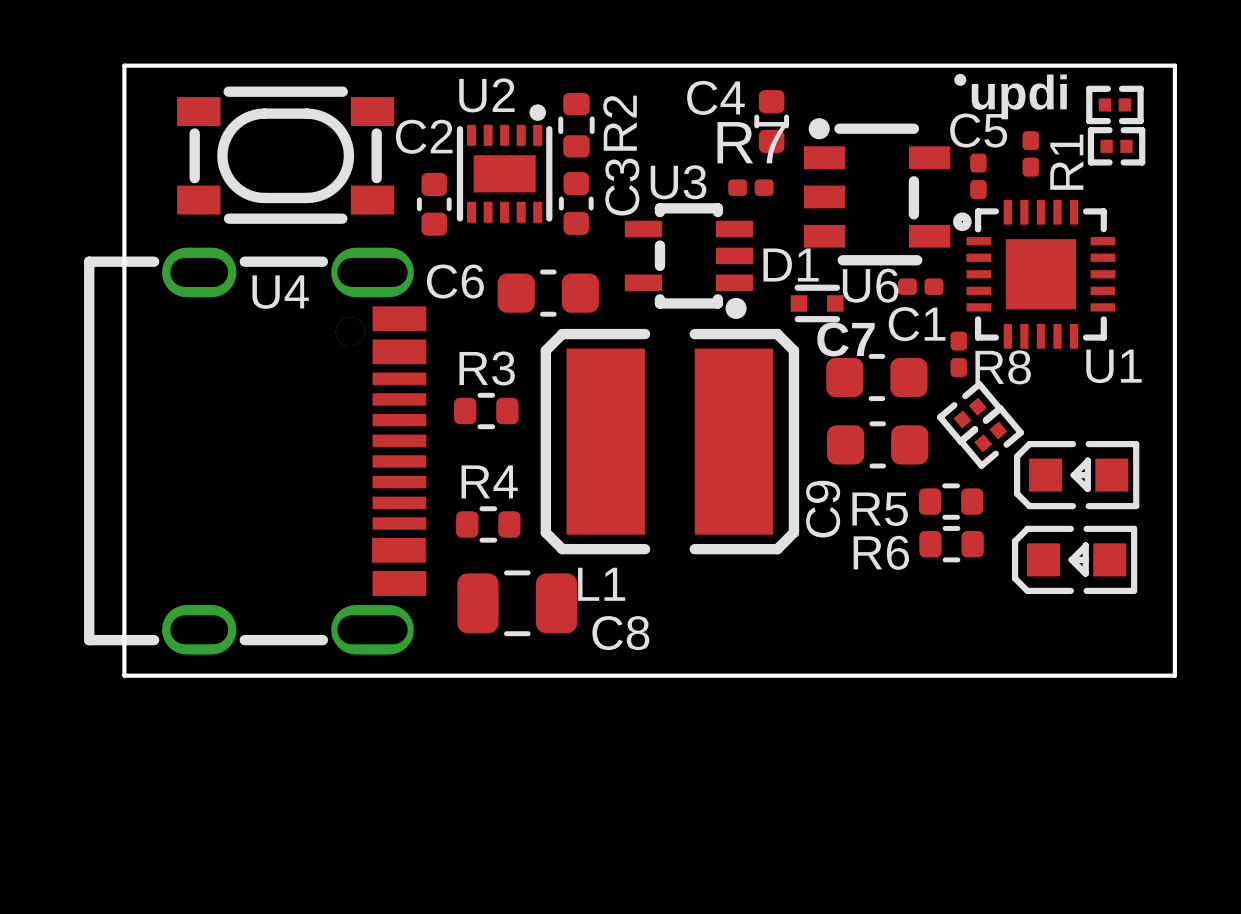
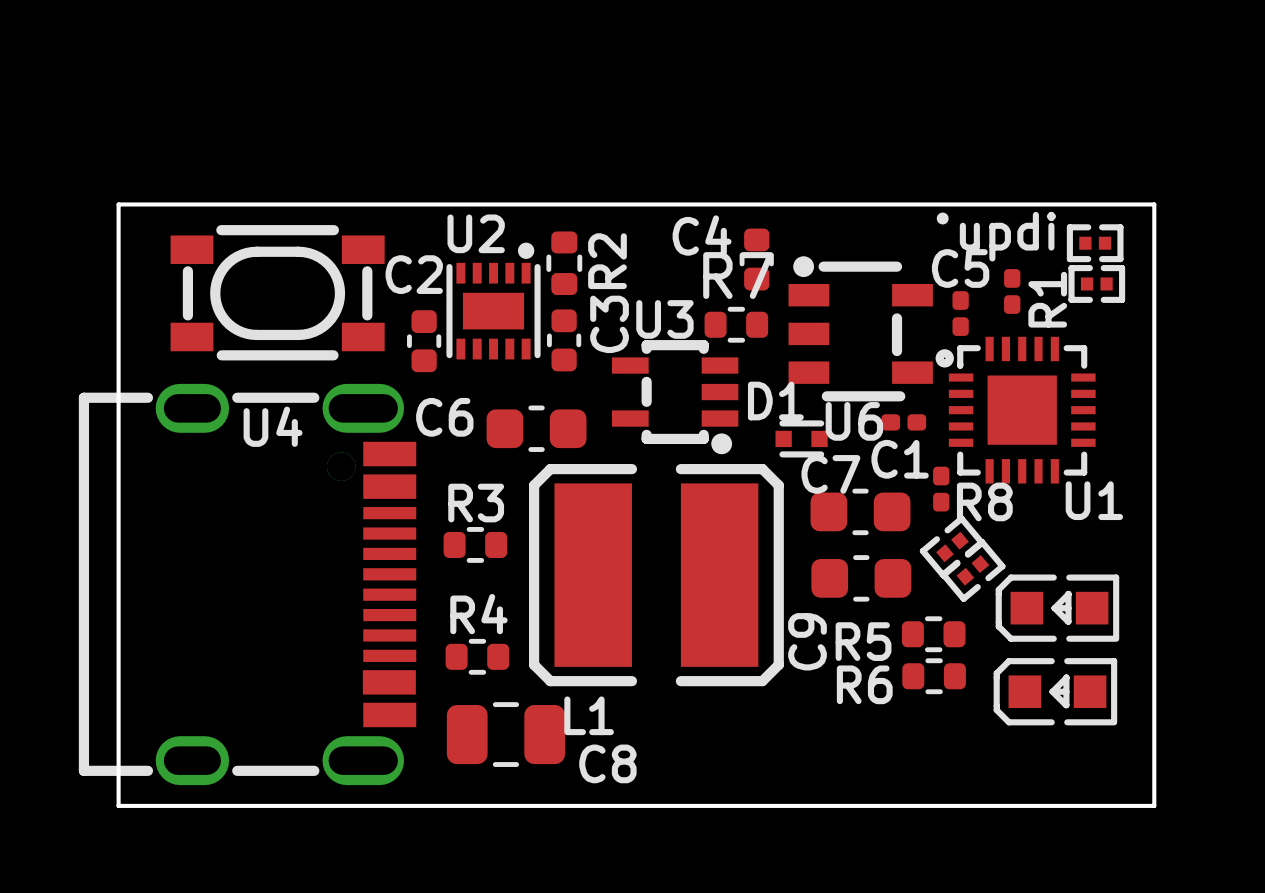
R7 footprint: [728, 179, 774, 196] -> [704, 306, 769, 343]

